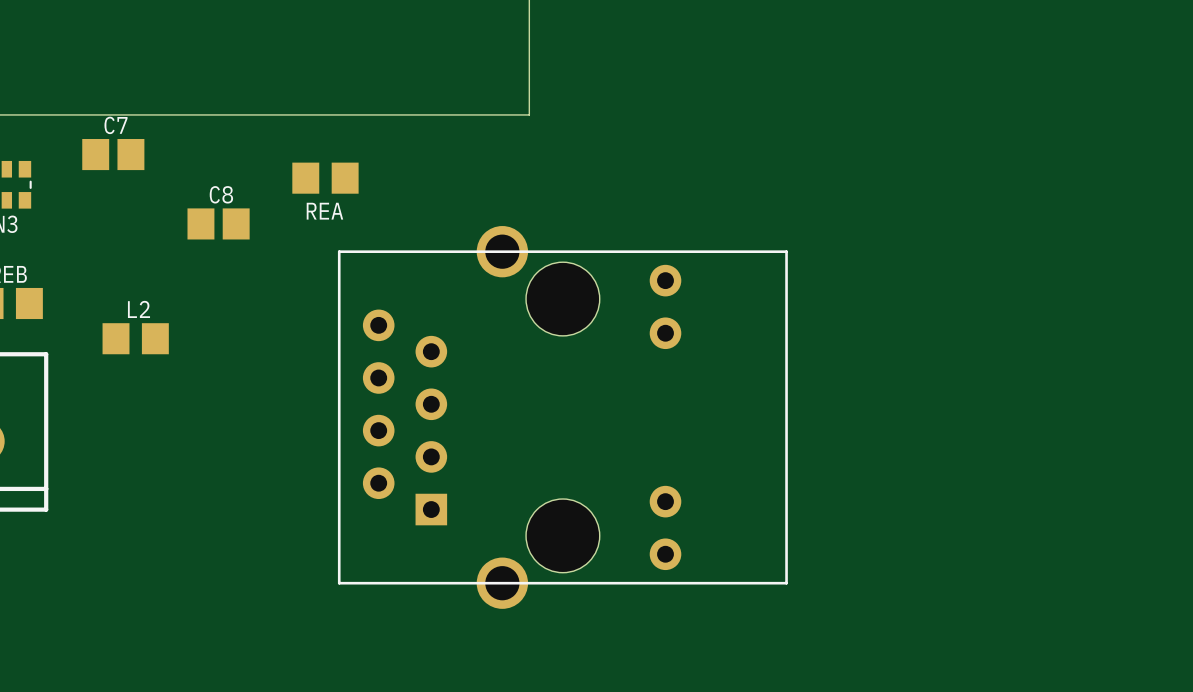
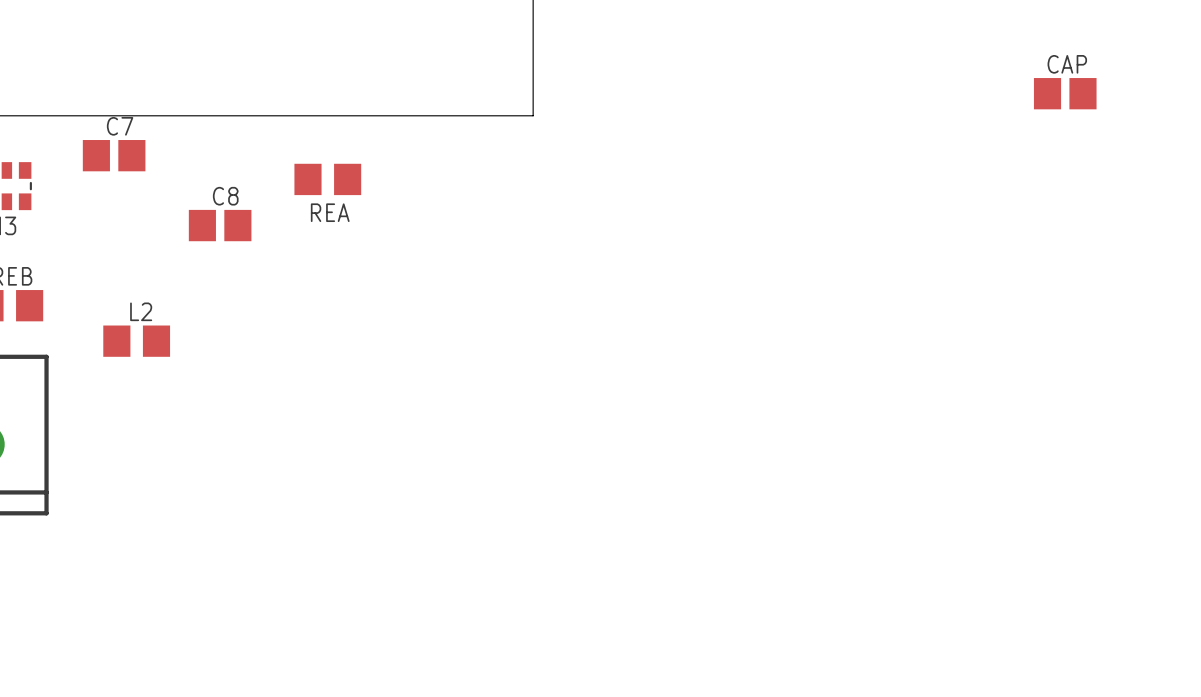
CAP: none -> (1065, 93)
part: (562, 417) -> none

